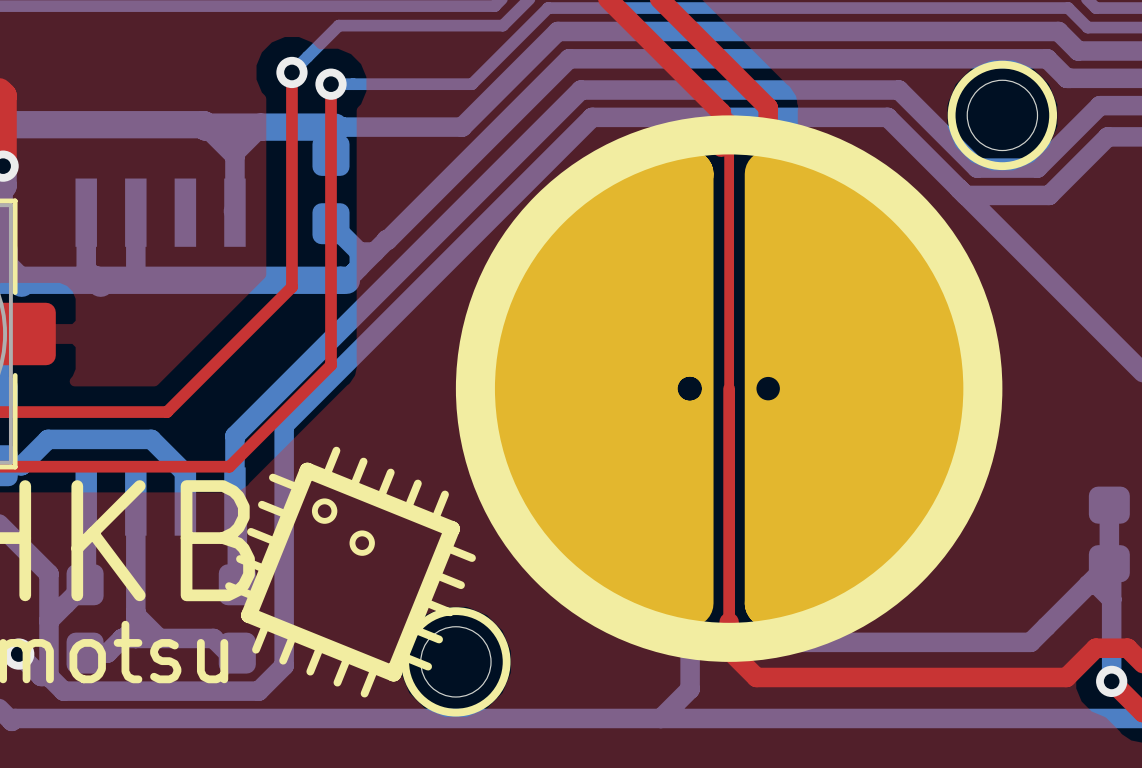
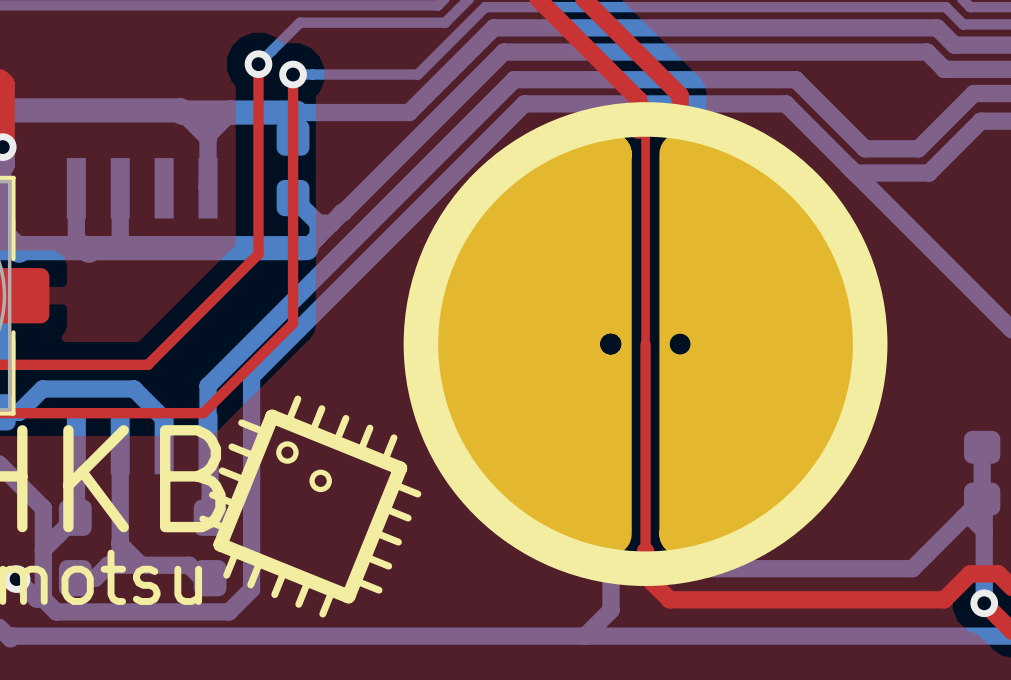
part footprint: [401, 60, 1058, 717] -> [403, 102, 888, 587]

